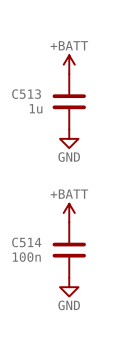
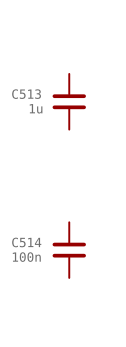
power symbol: +BATT (69, 64) -> none
power symbol: GND (69, 138) -> none
power symbol: +BATT (69, 213) -> none
power symbol: GND (69, 287) -> none

